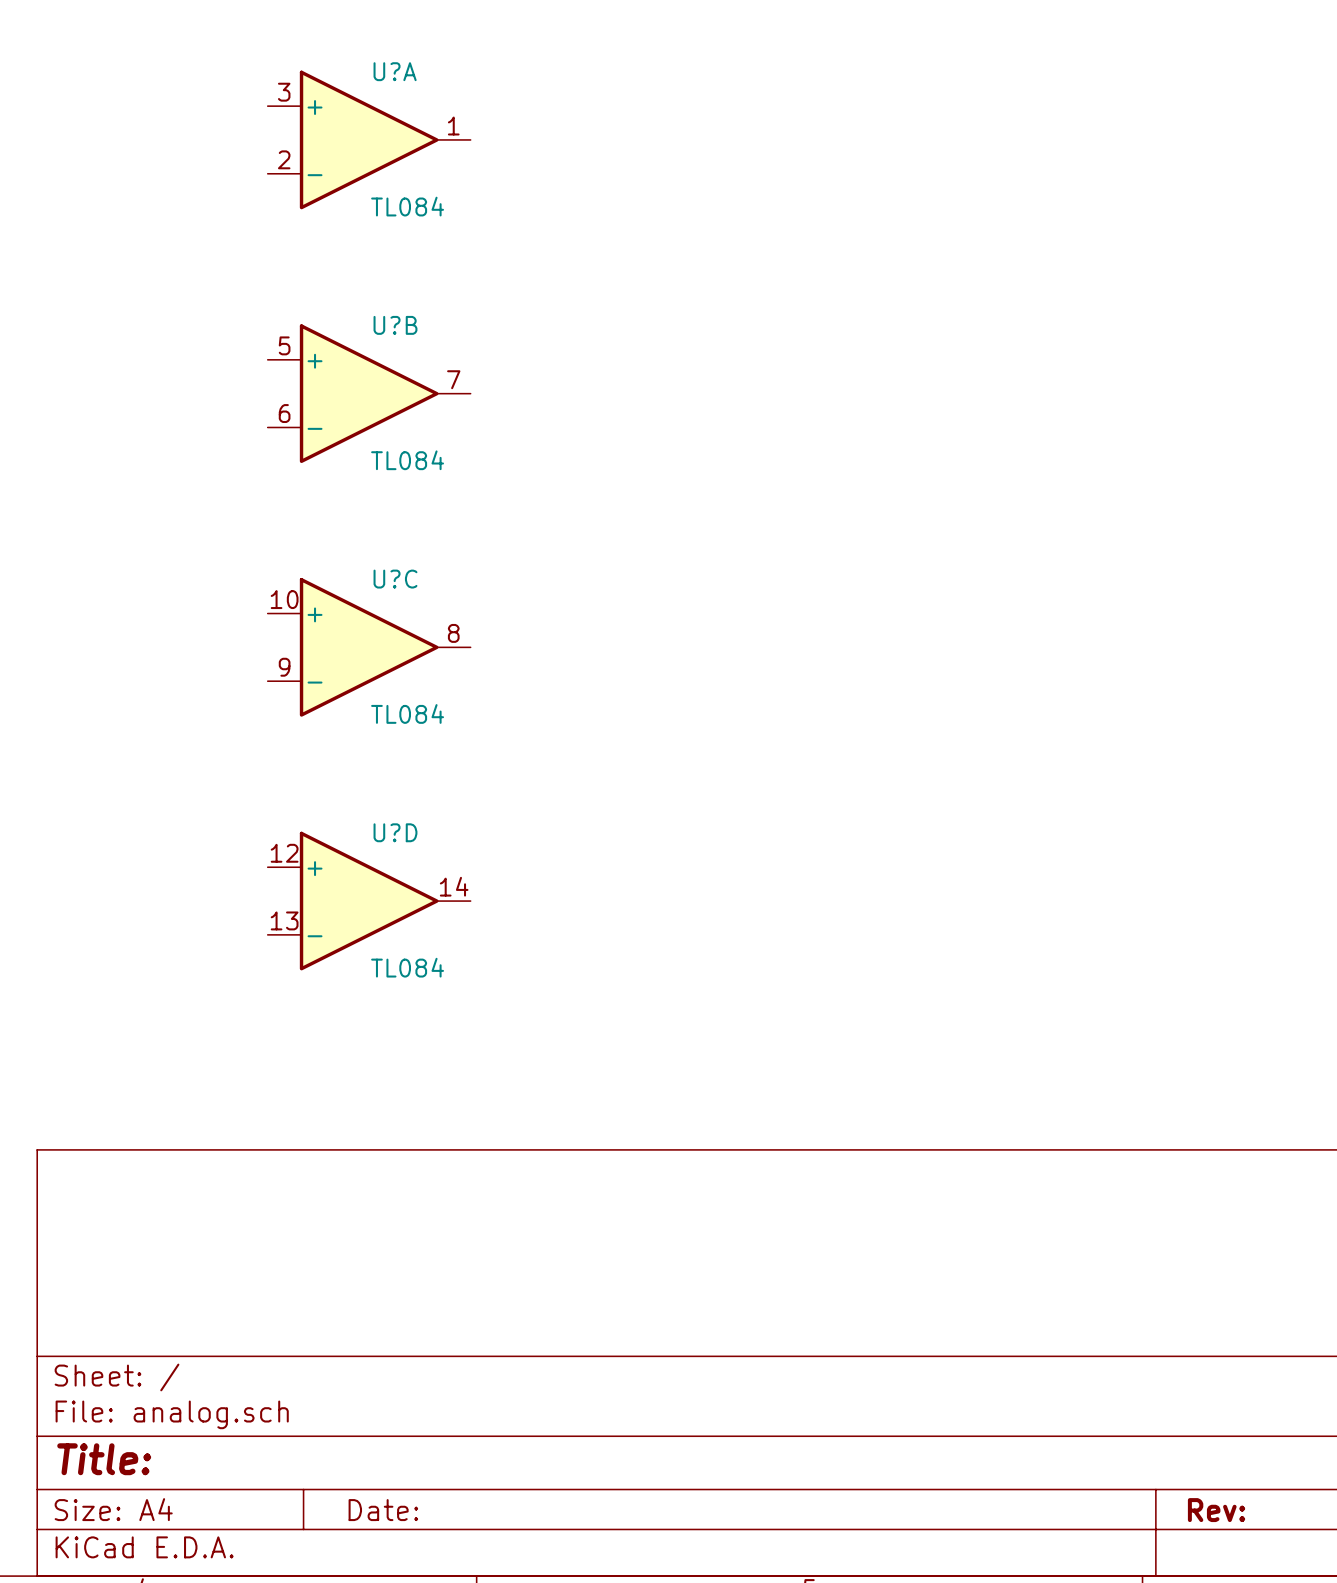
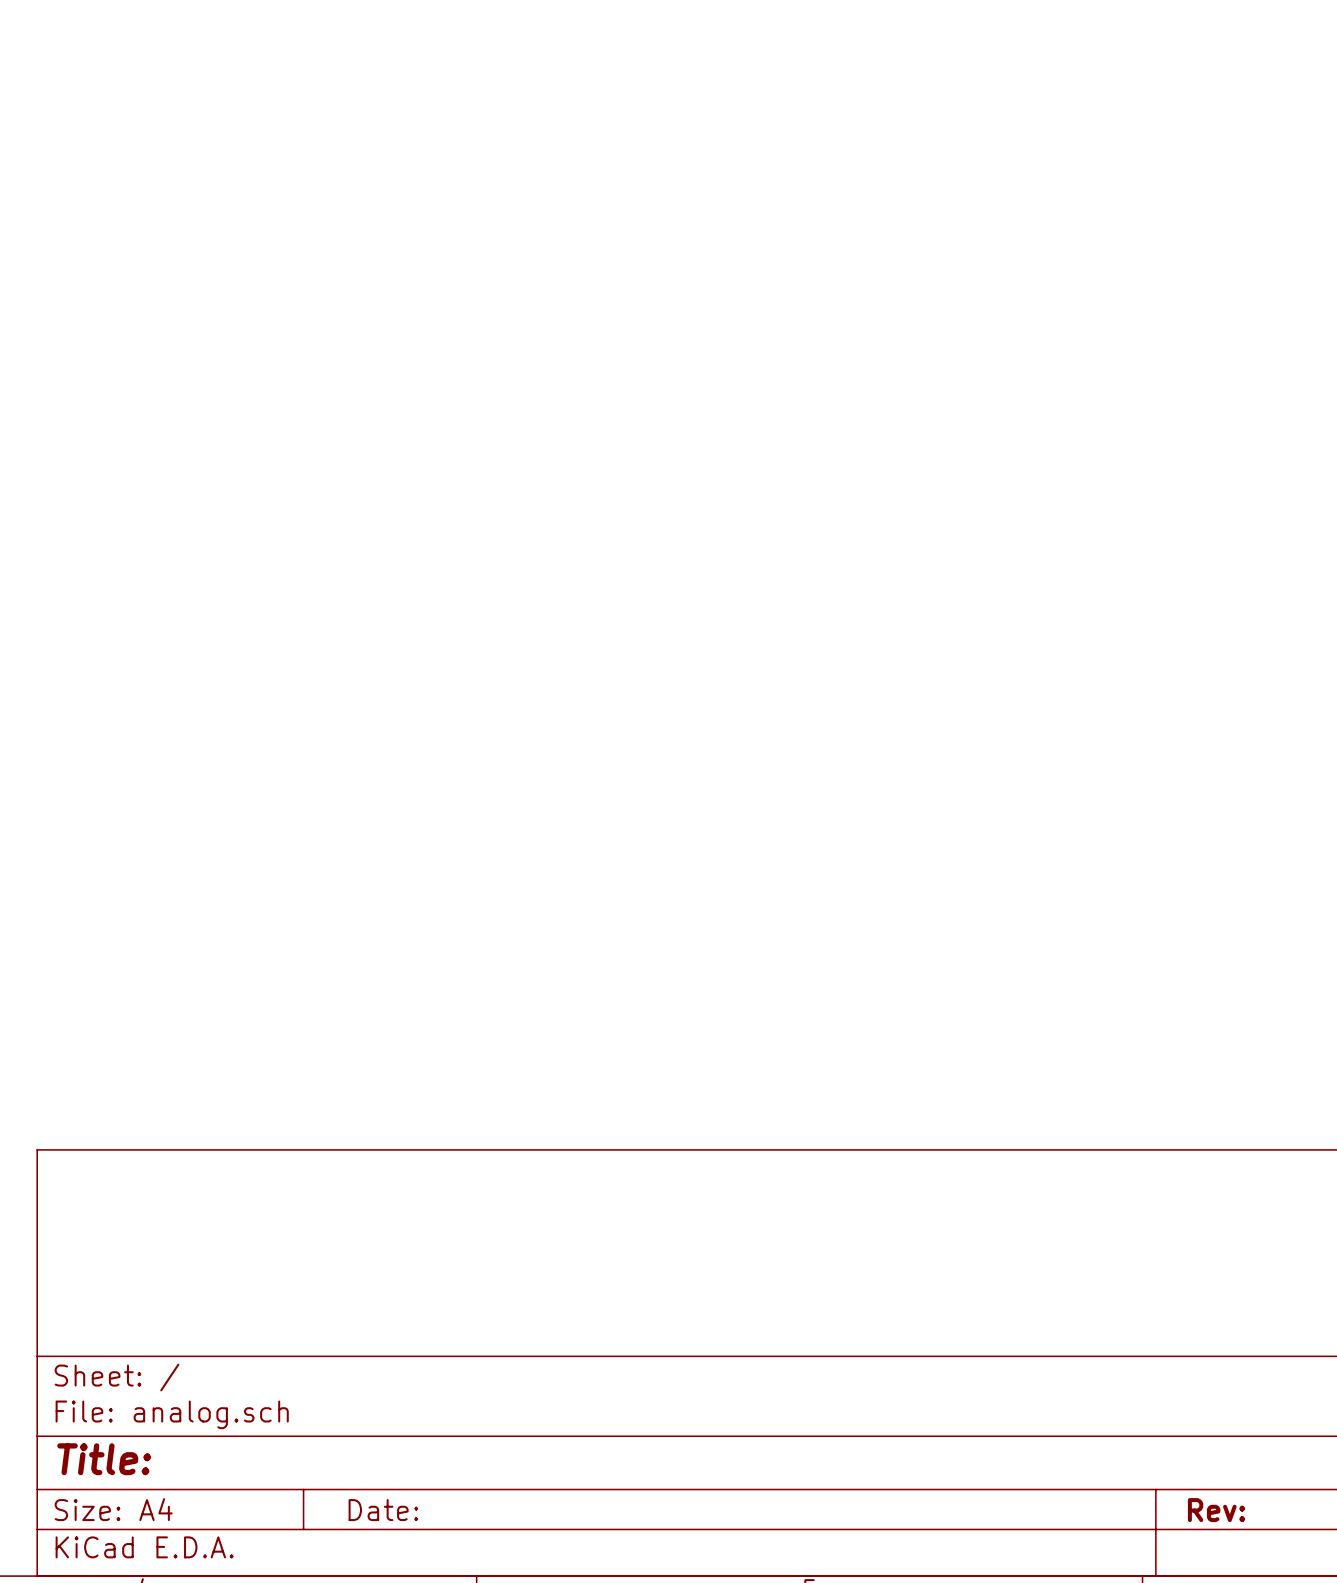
U?A: TL084 (369, 139) -> none
U?B: TL084 (369, 393) -> none
U?C: TL084 (369, 647) -> none
U?D: TL084 (369, 901) -> none

